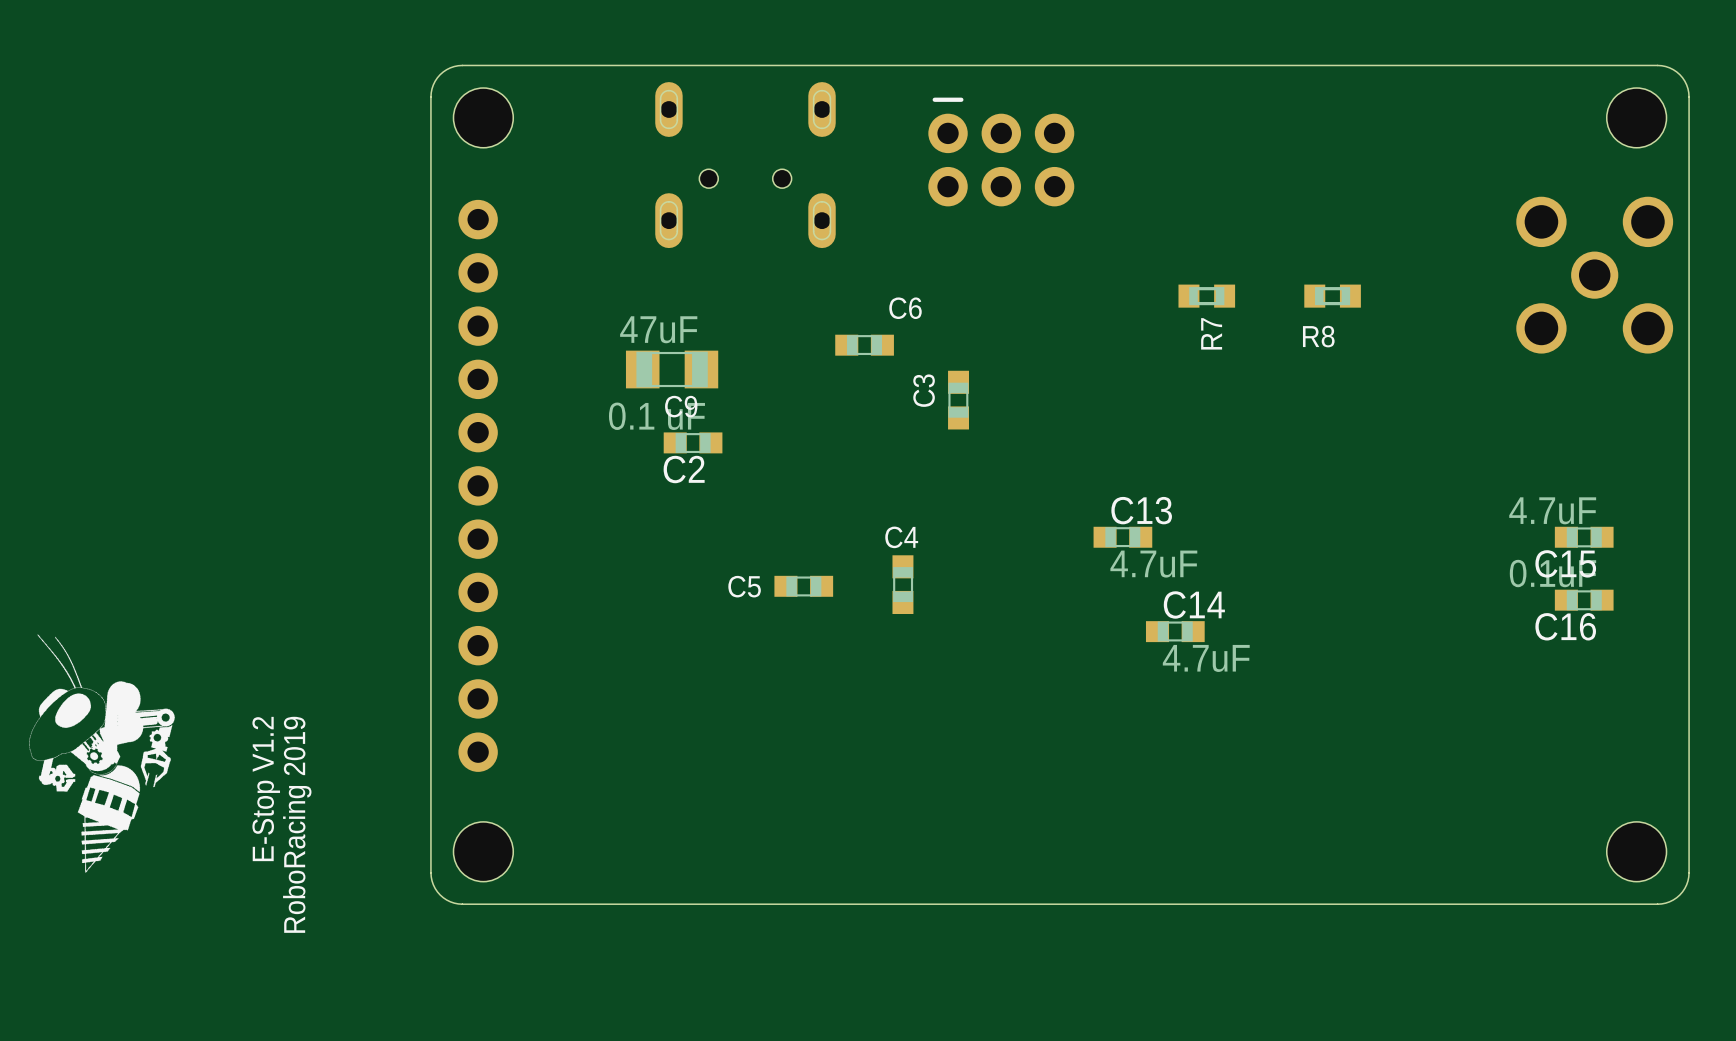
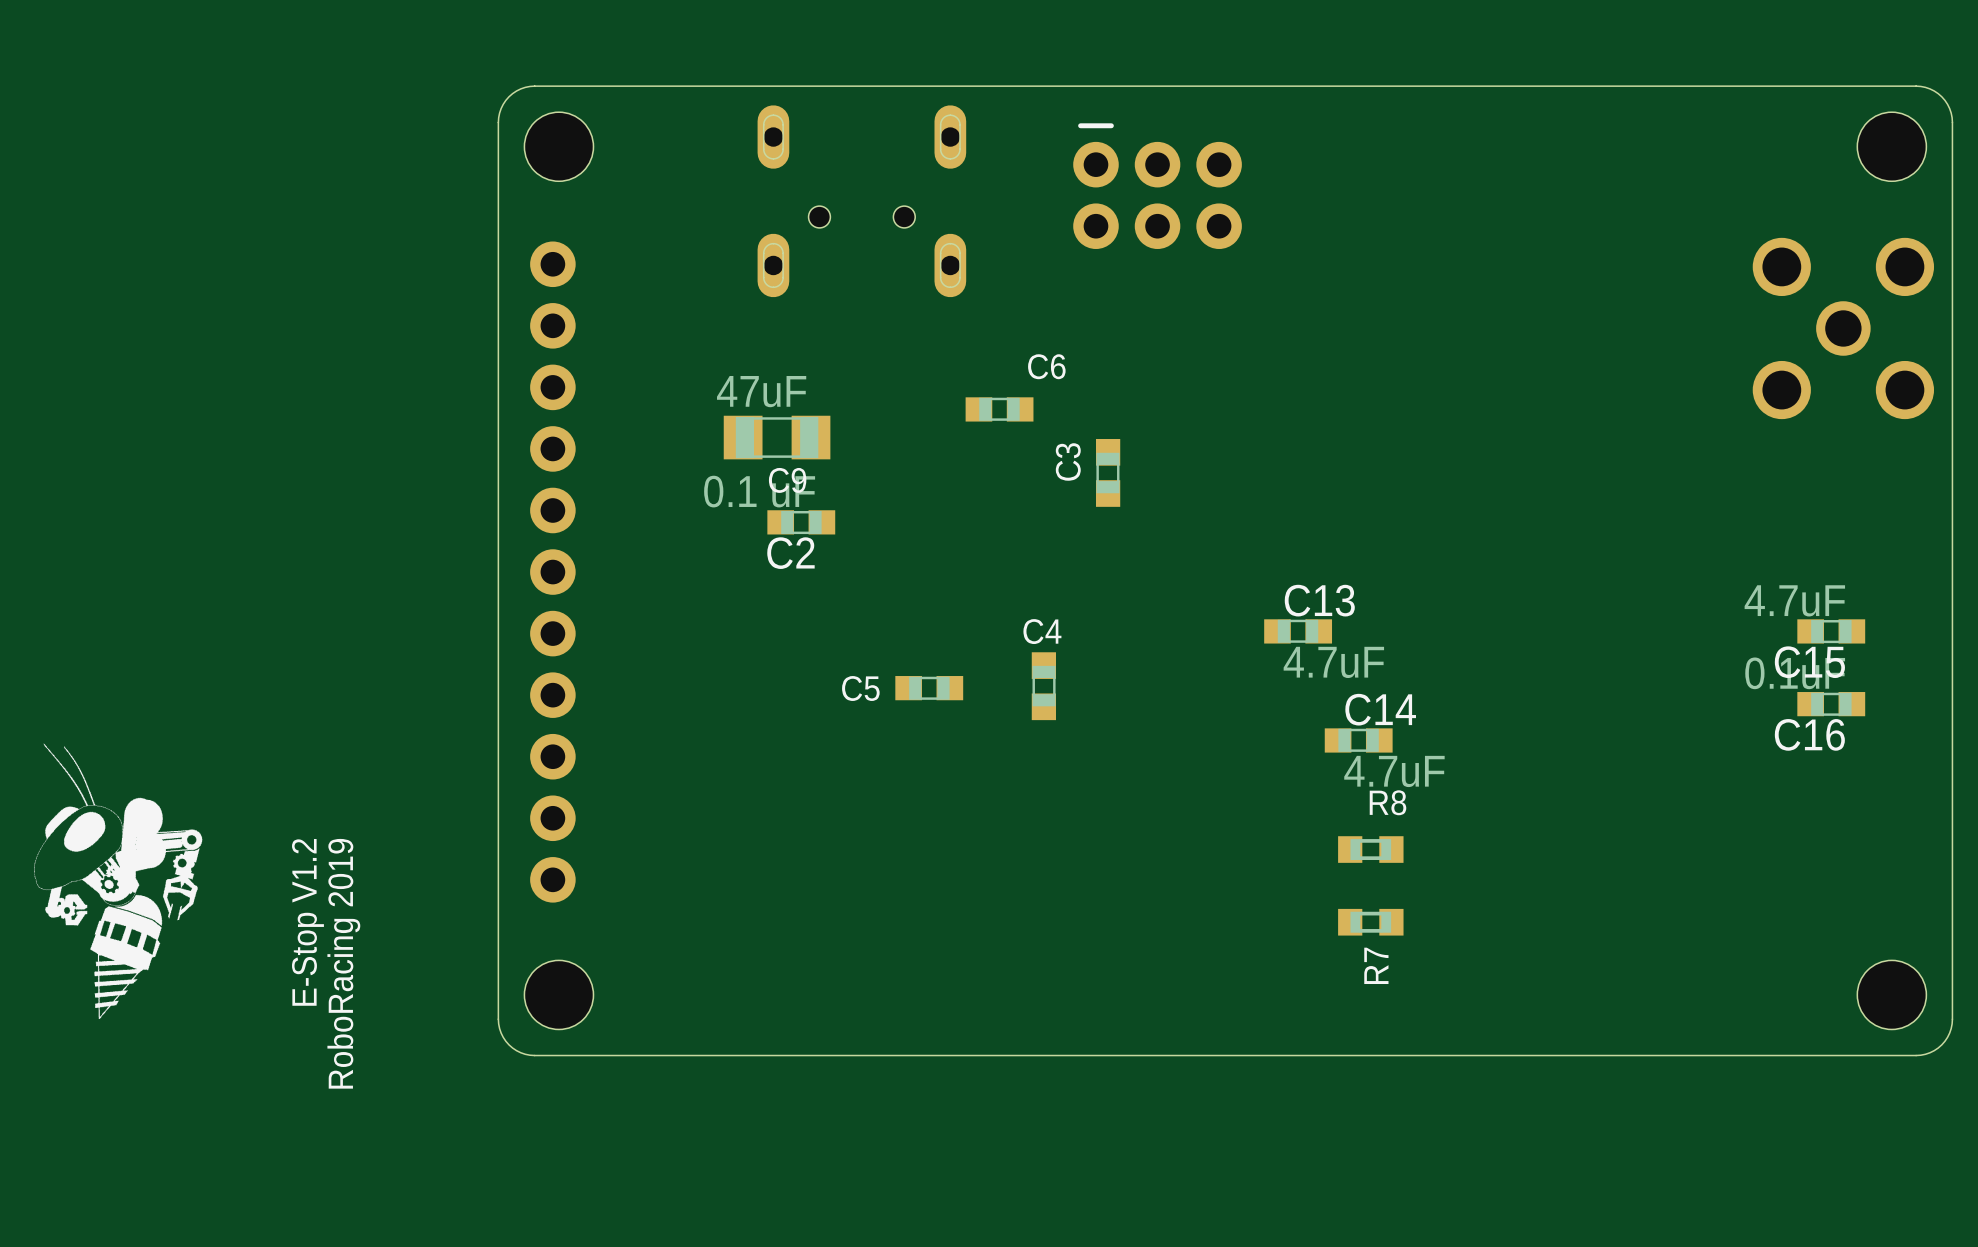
R7 position: (1206, 296) -> (1370, 922)
R8 position: (1332, 296) -> (1370, 849)
R8 name position: R8 (1318, 336) -> R8 (1388, 802)

